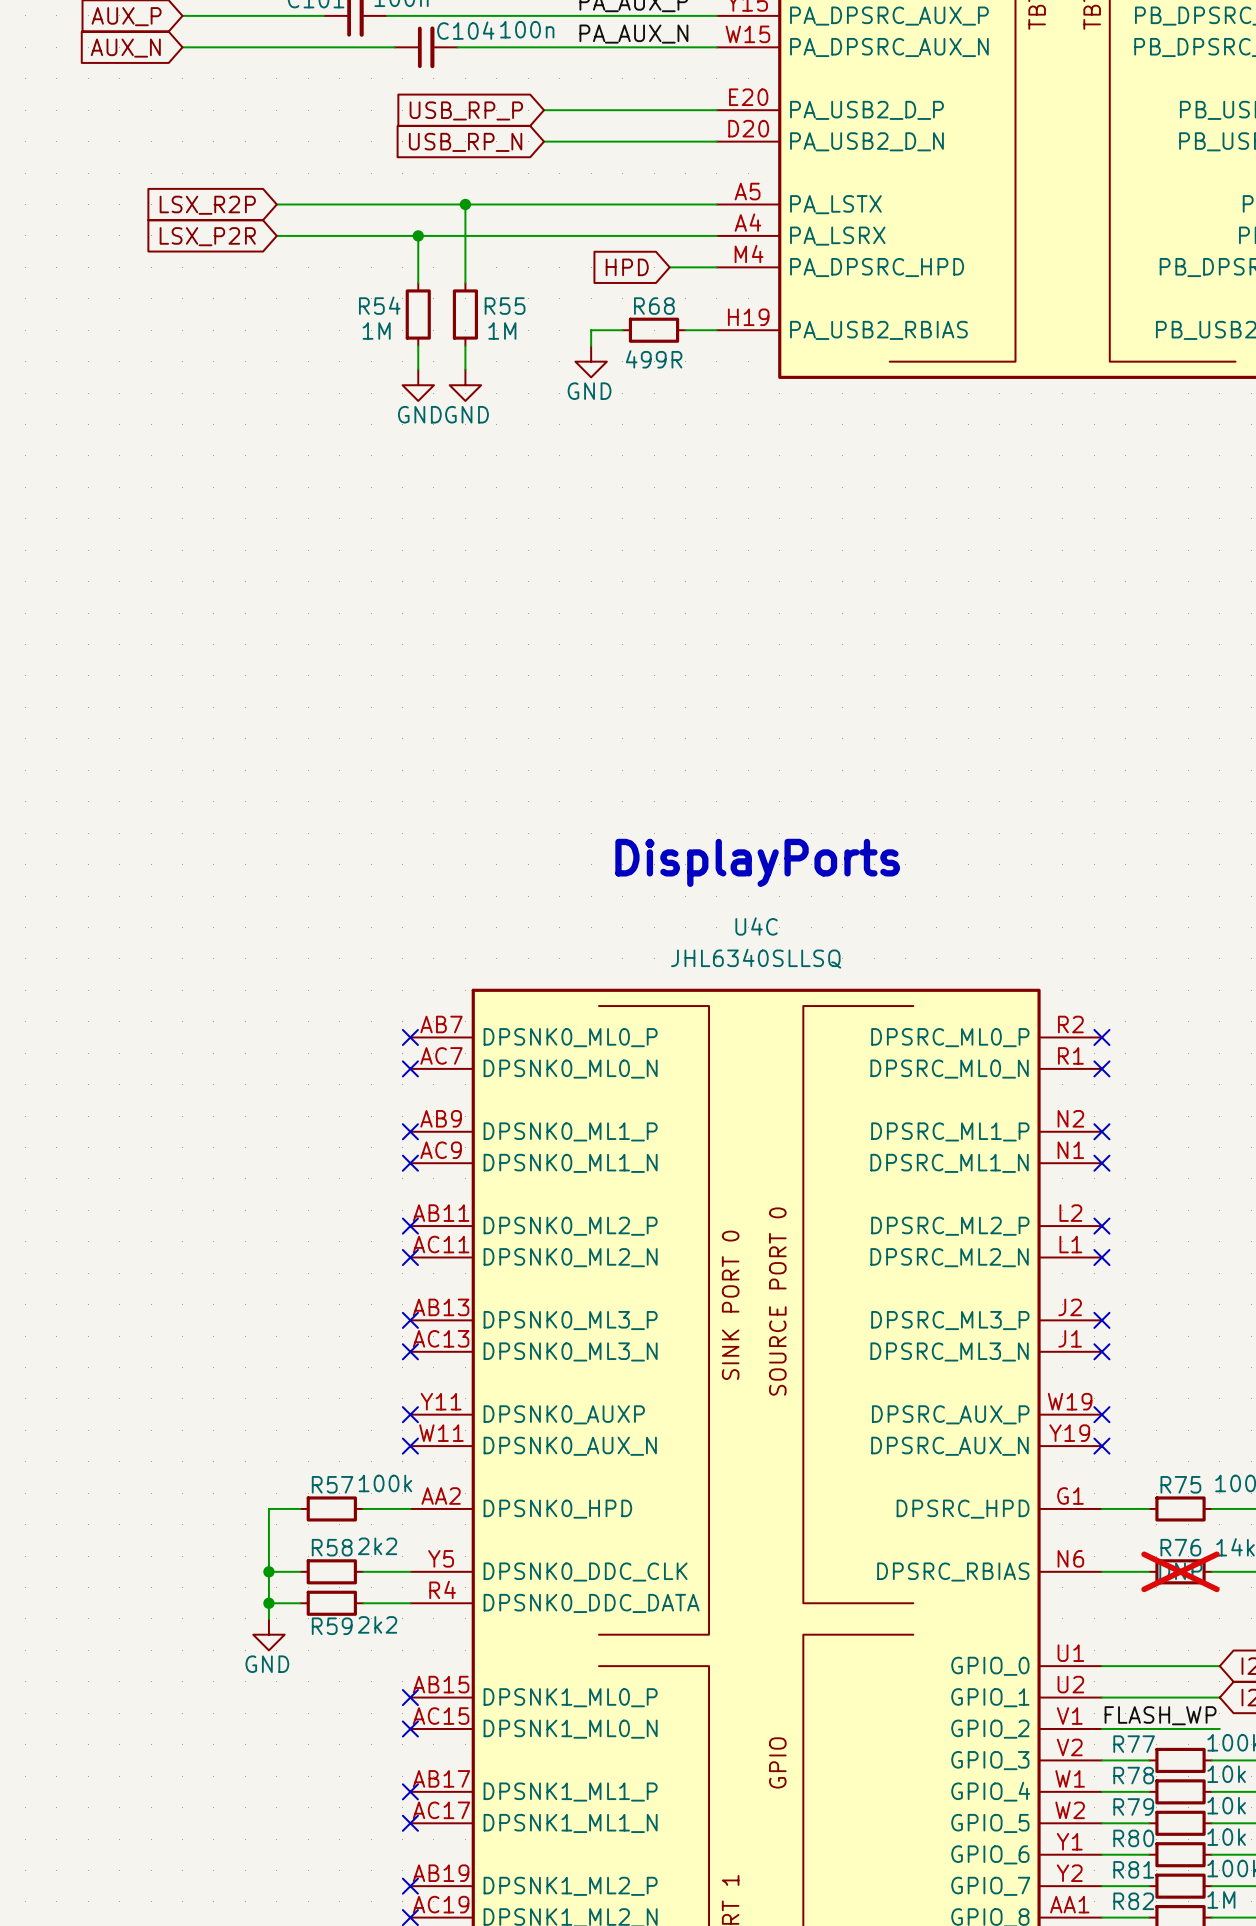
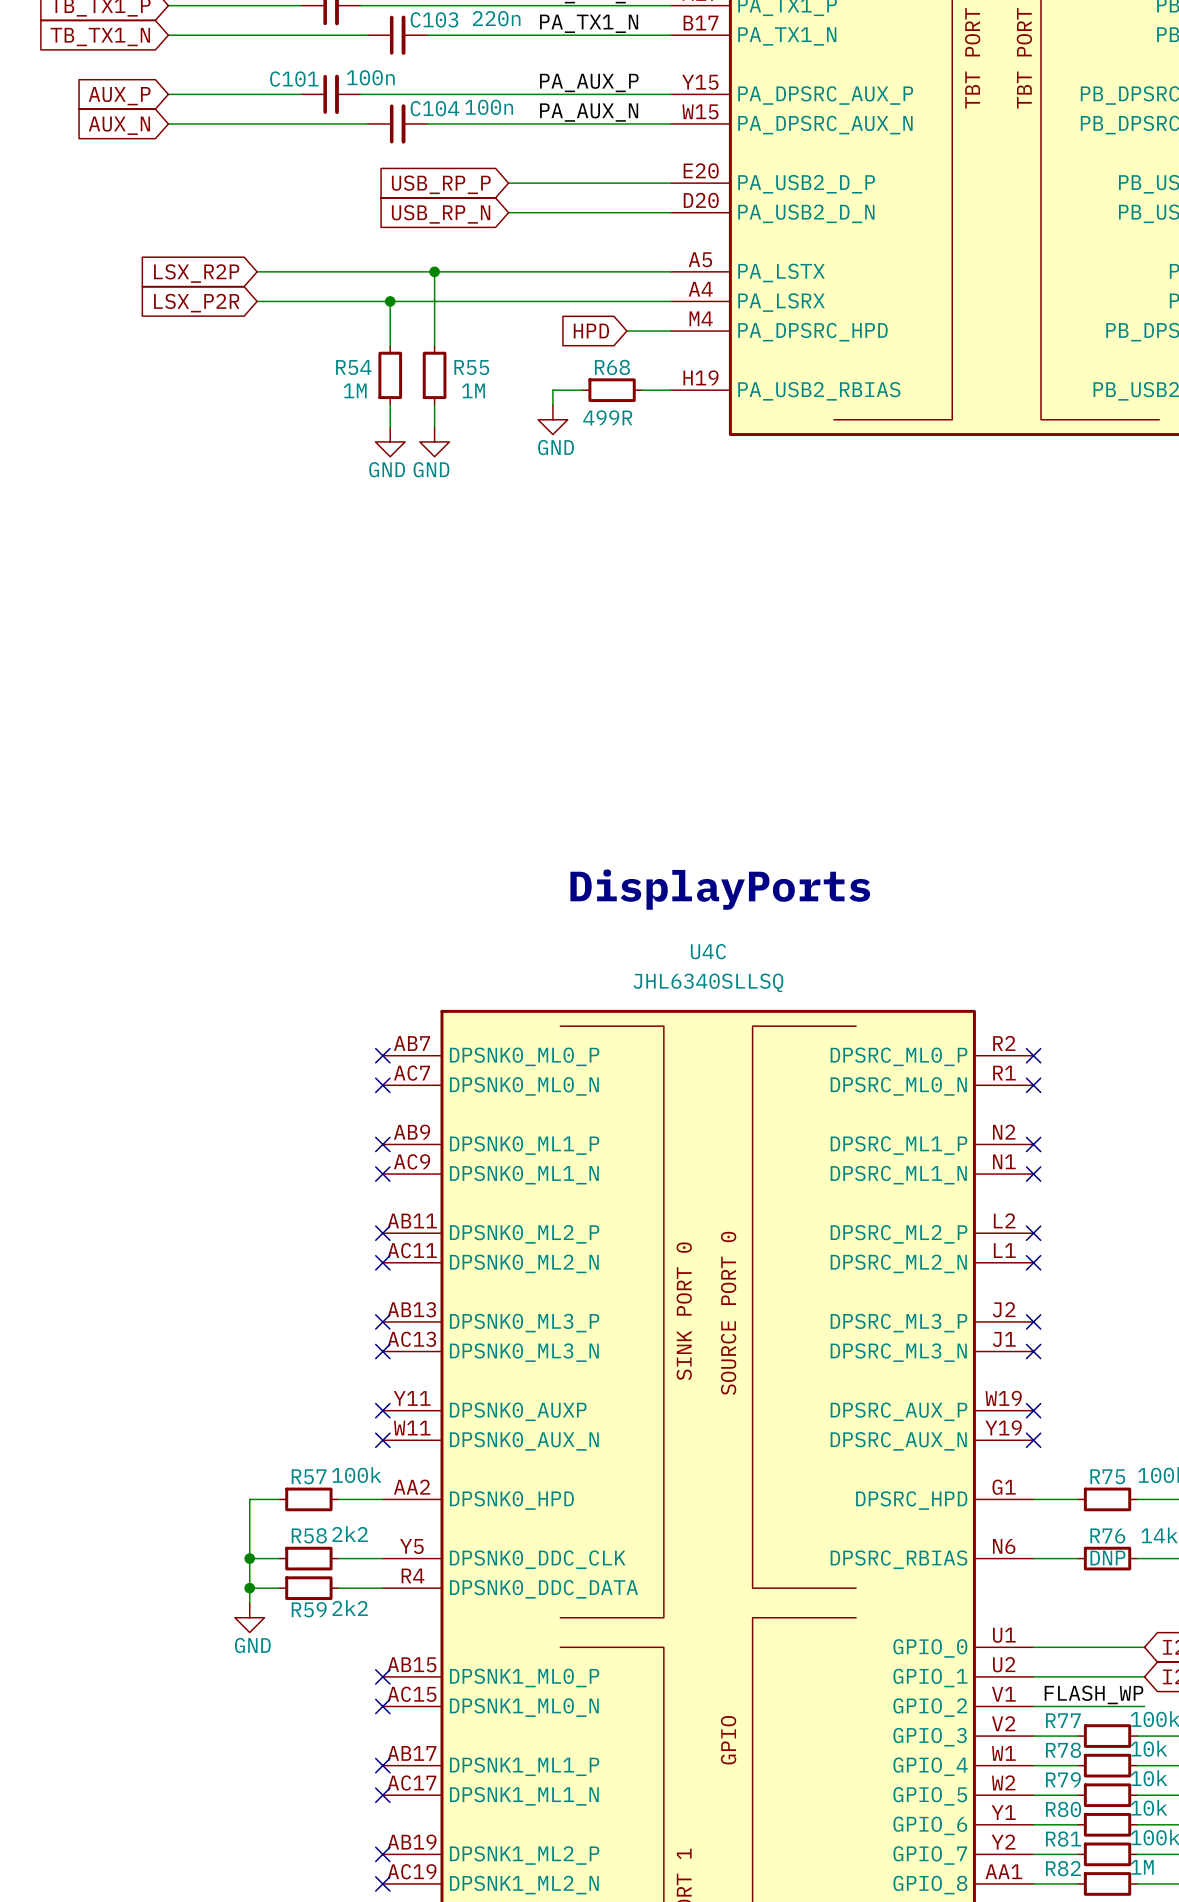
R76 do-not-place cross: (1180, 1571) -> none

